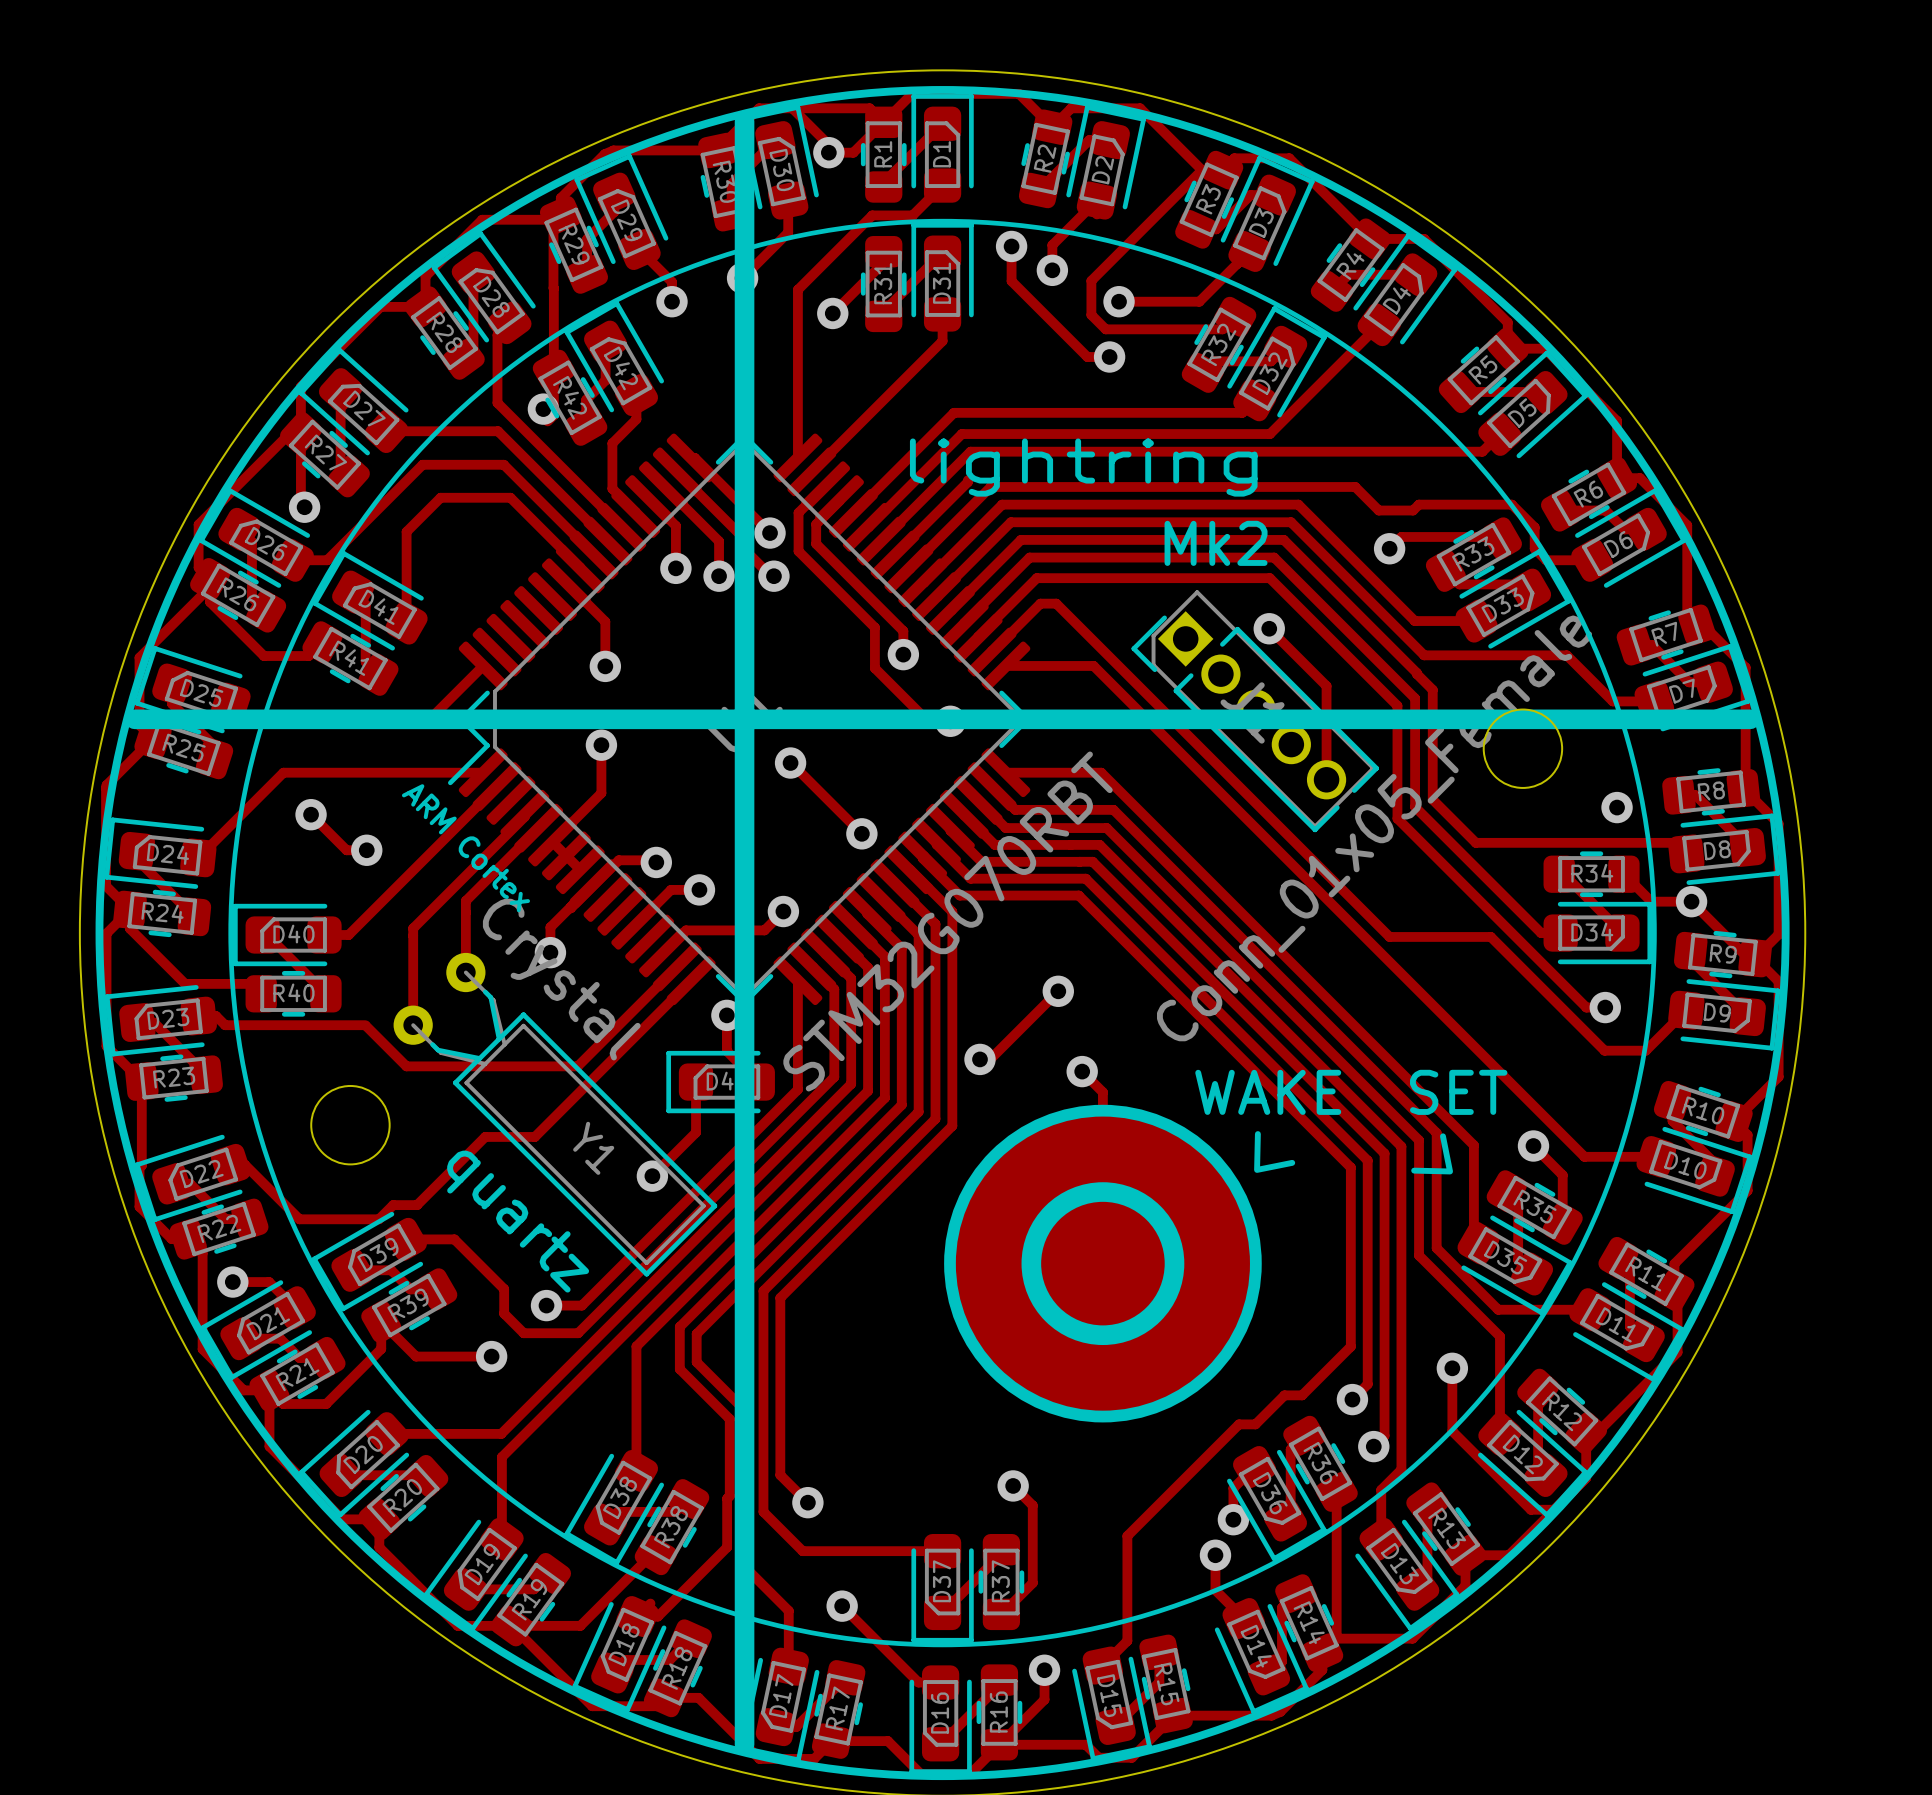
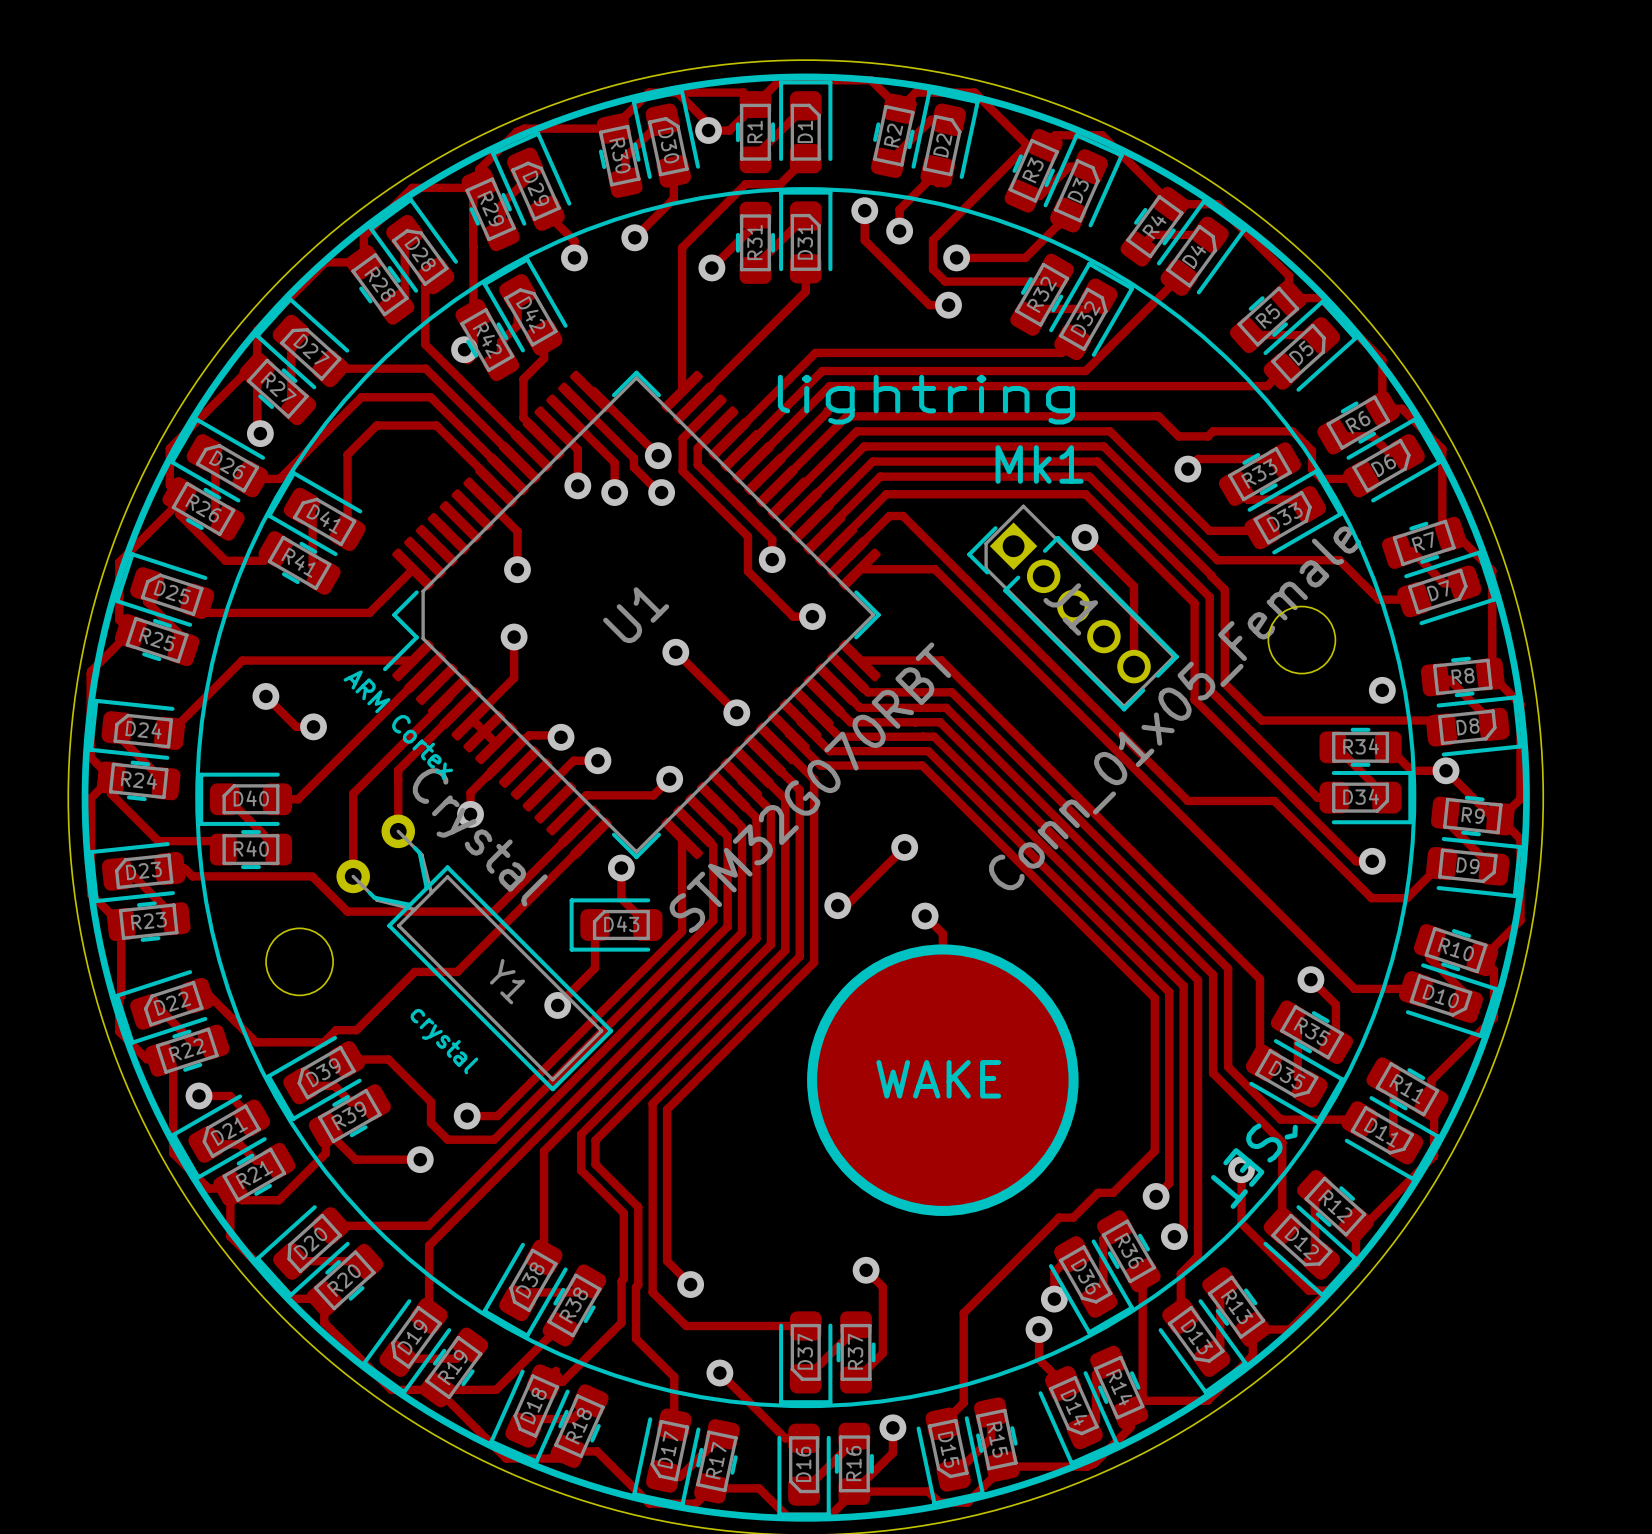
line: (744, 121) (744, 1744) -> none
text: Mk2 (1216, 543) -> Mk1 (1039, 464)
line: (134, 719) (1750, 719) -> none
text: WAKE SET (1351, 1092) -> none
text: ^ (1274, 1151) -> none
text: ^ (1432, 1153) -> none
drawing: [1021, 1182, 1185, 1346] -> none
text: quartz (518, 1221) -> crystal (444, 1041)
text: none -> WAKE (938, 1079)
text: none -> ^SET (1254, 1166)

